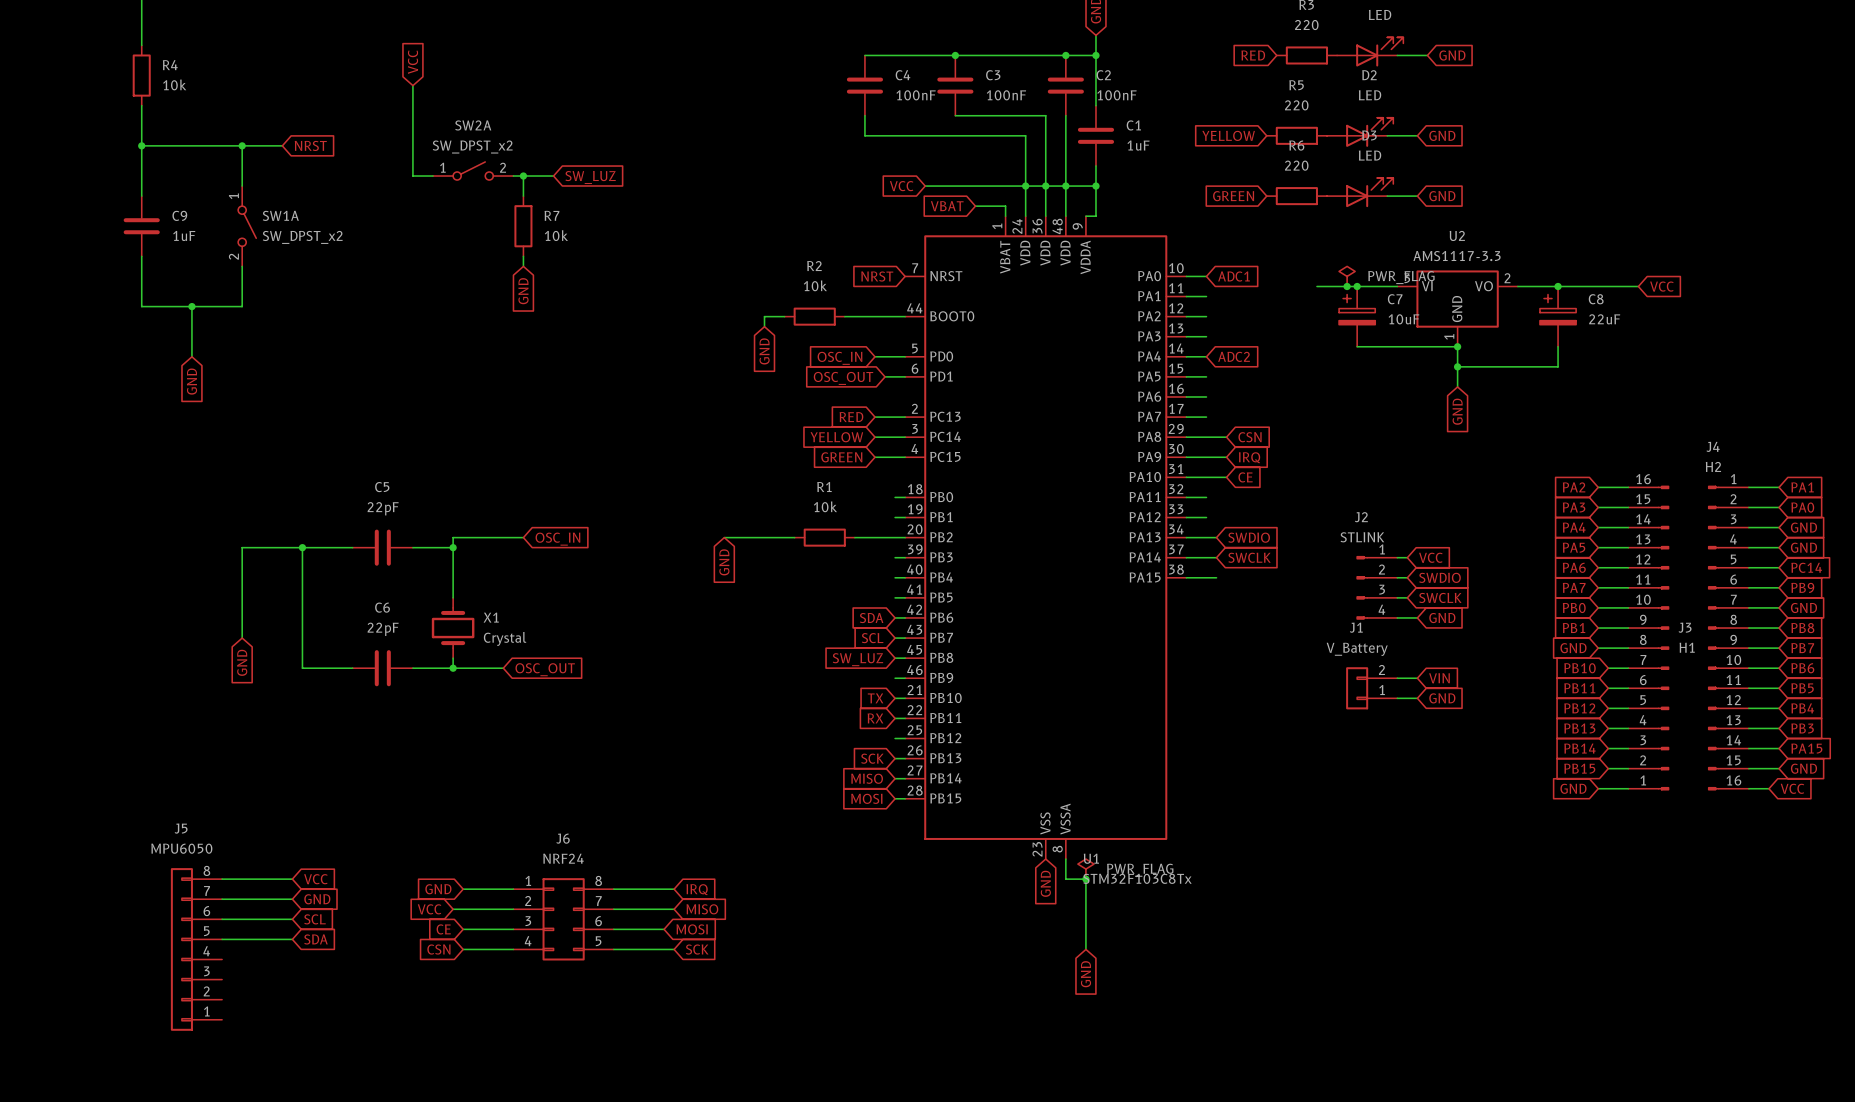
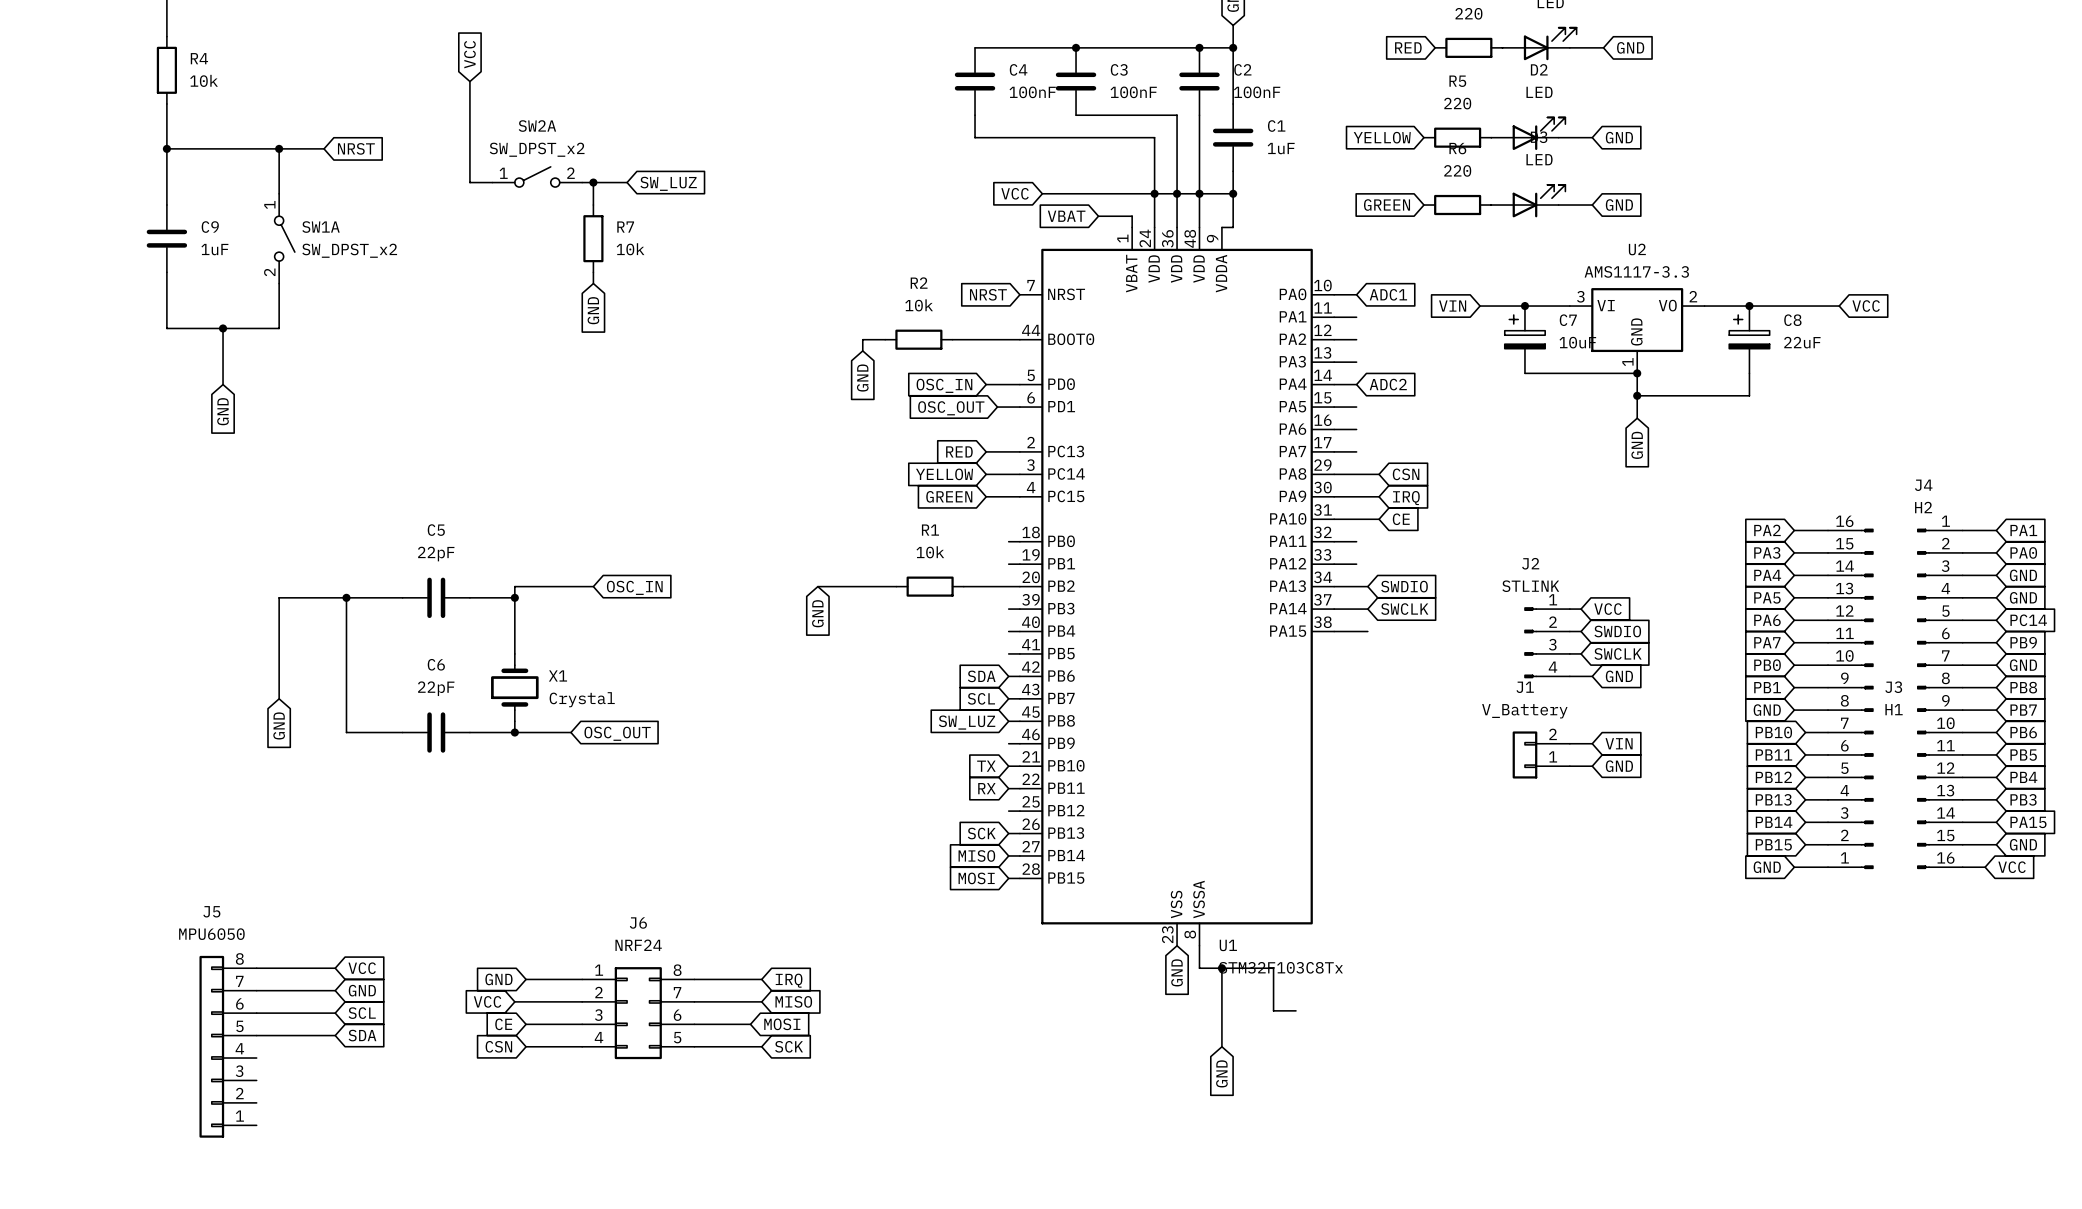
power symbol: PWR_FLAG (1347, 276) -> none
global label: none -> VIN (1452, 306)
junction: (1347, 286) -> none
power symbol: PWR_FLAG (1085, 869) -> none
wire: none -> (1221, 968) (1273, 968) (1273, 1010) (1296, 1010)

